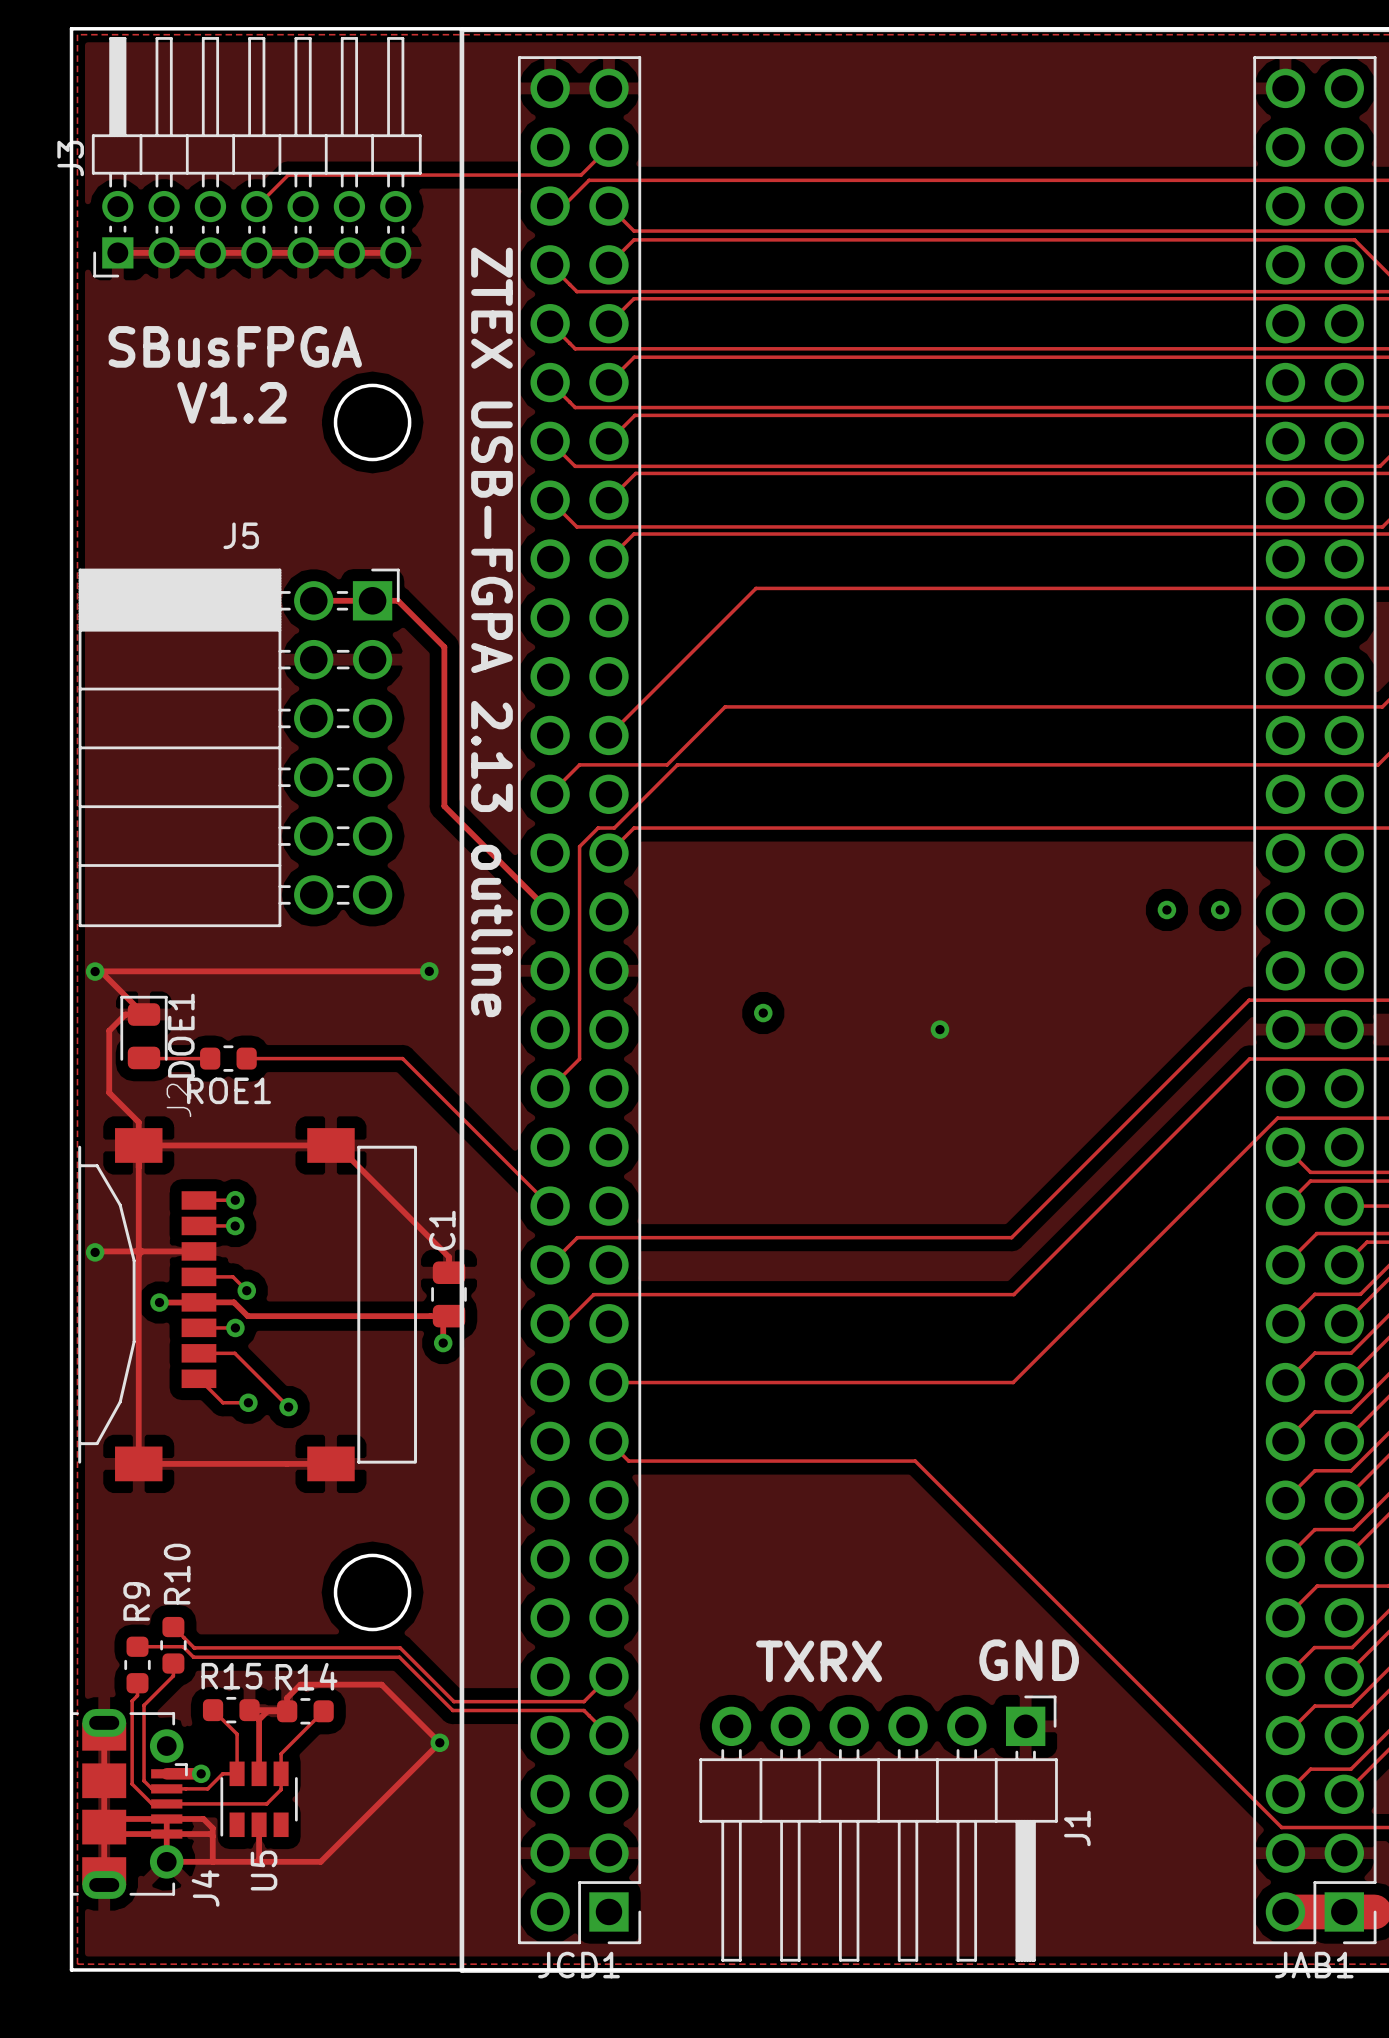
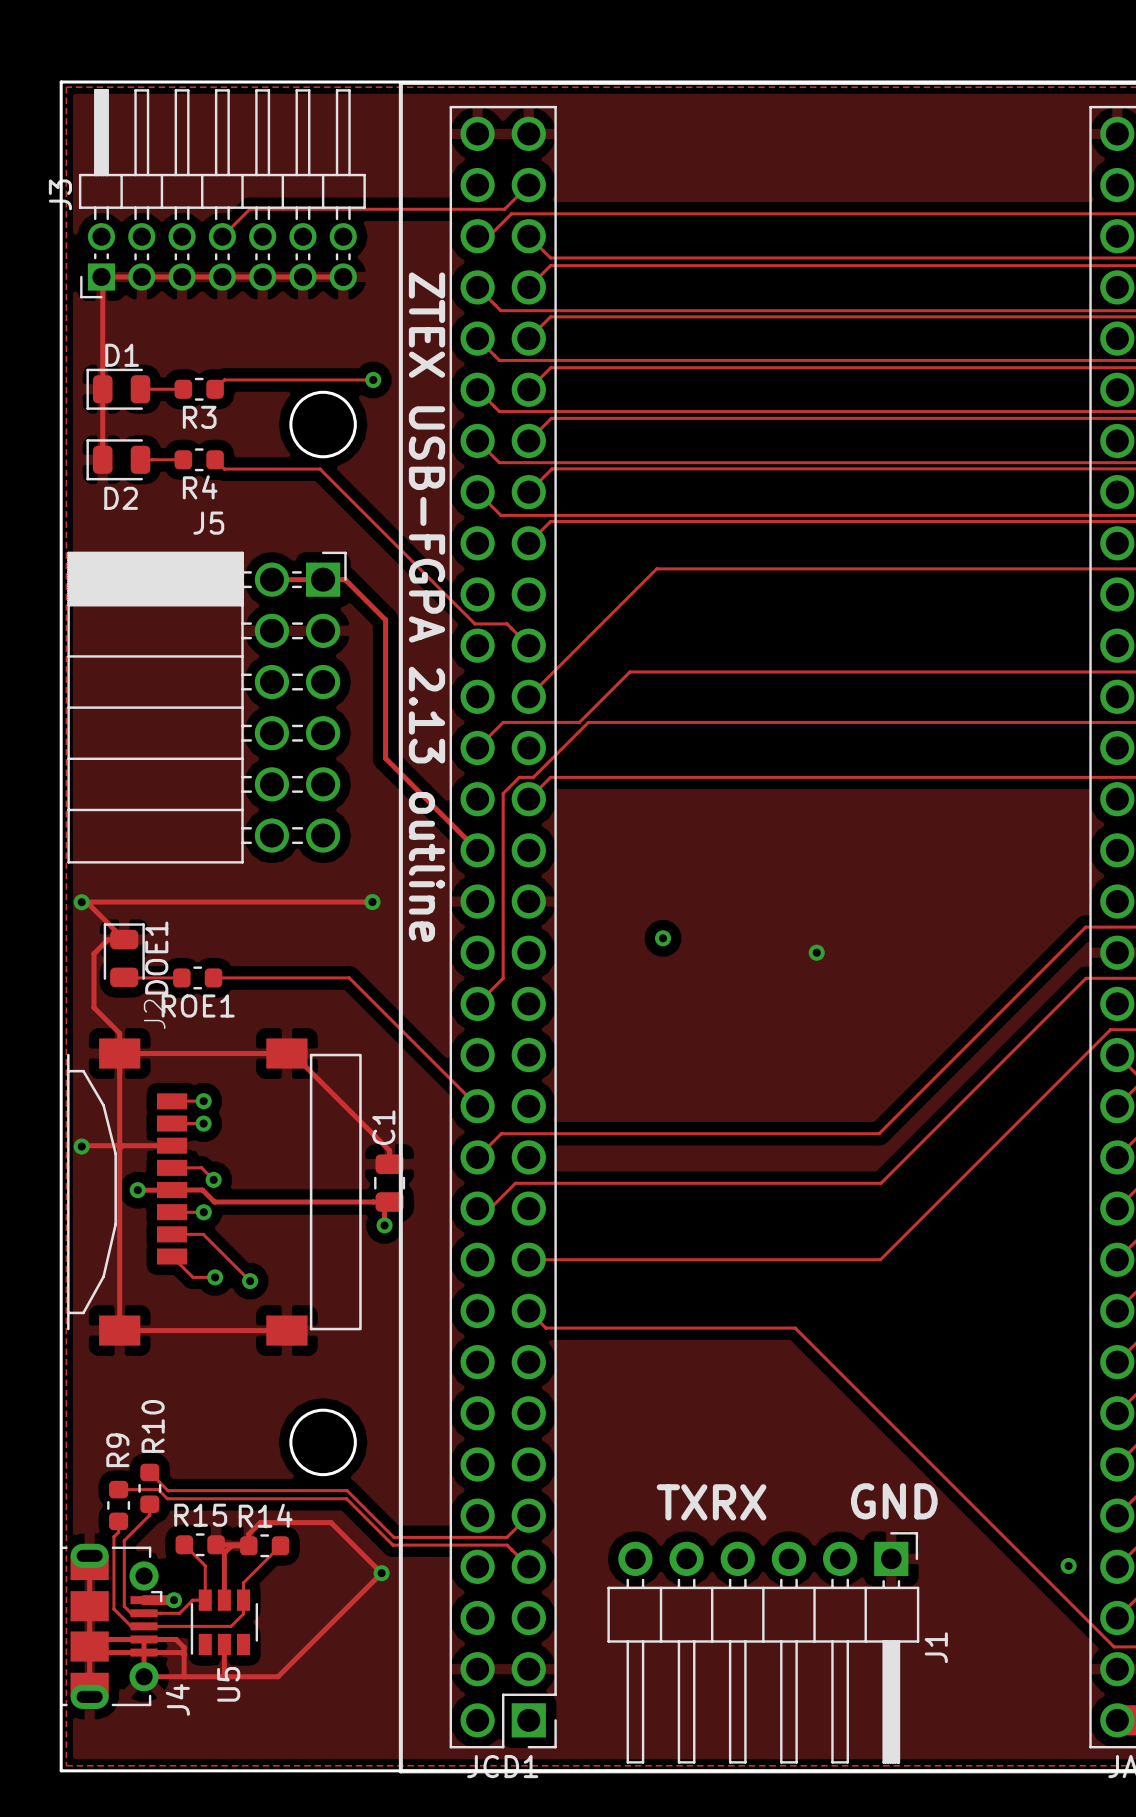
track: none -> (102, 278) (102, 459)
text: SBusFPGA (235, 346) -> none
track: none -> (373, 379) (224, 379) (215, 389)
via: none -> (373, 379)
D1: none -> (118, 389)
track: none -> (140, 389) (183, 389)
R3: none -> (199, 389)
text: V1.2 (231, 402) -> none
D2: none -> (118, 459)
track: none -> (140, 459) (183, 459)
R4: none -> (199, 459)
track: none -> (215, 459) (224, 469) (320, 469) (474, 623) (507, 623) (528, 645)
via: (1166, 909) -> none
via: (1220, 909) -> none
via: none -> (1068, 1565)

